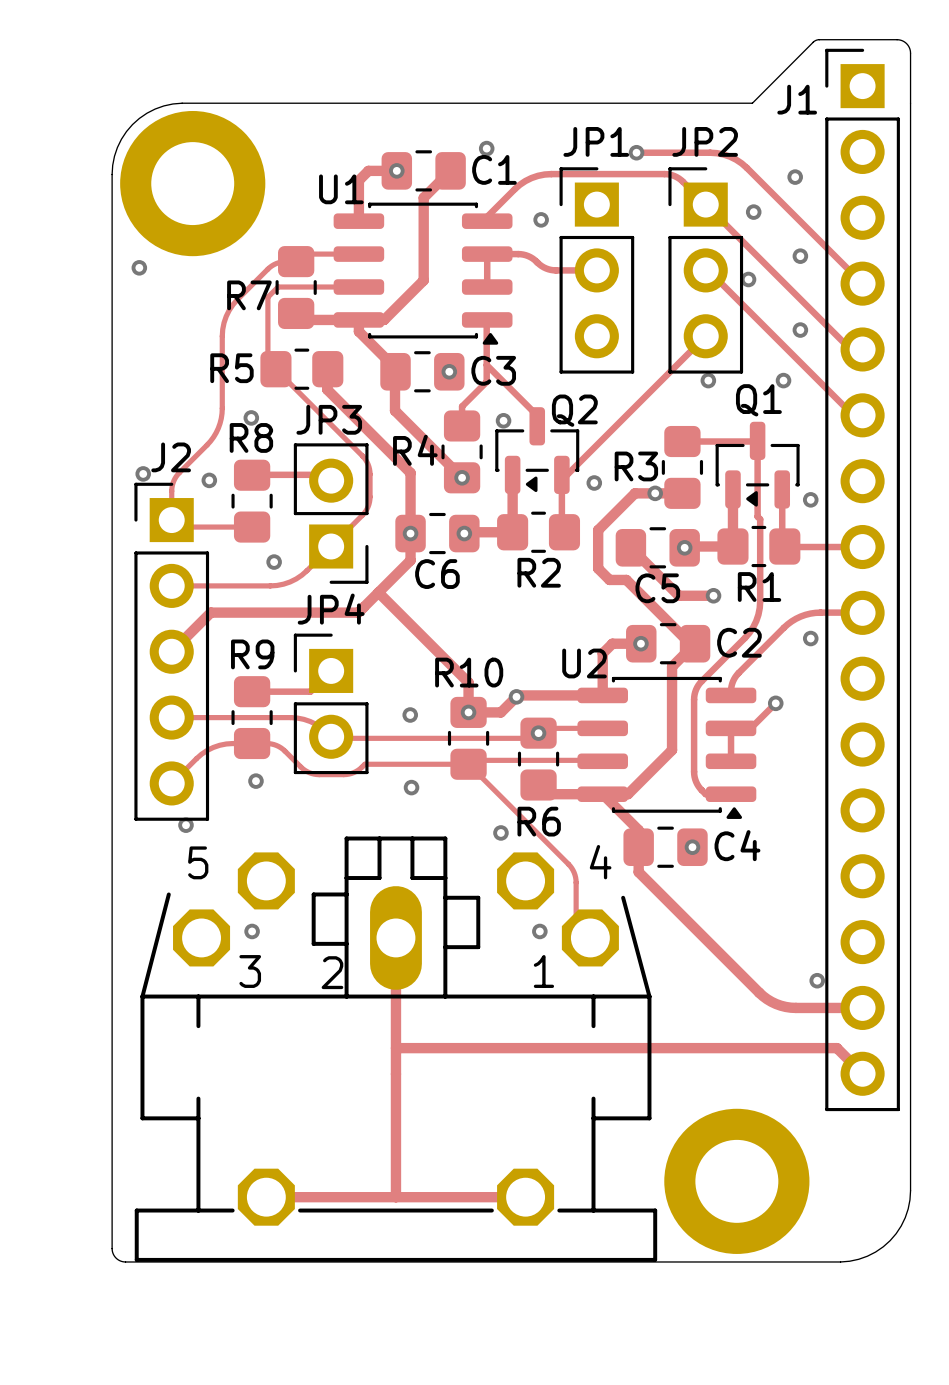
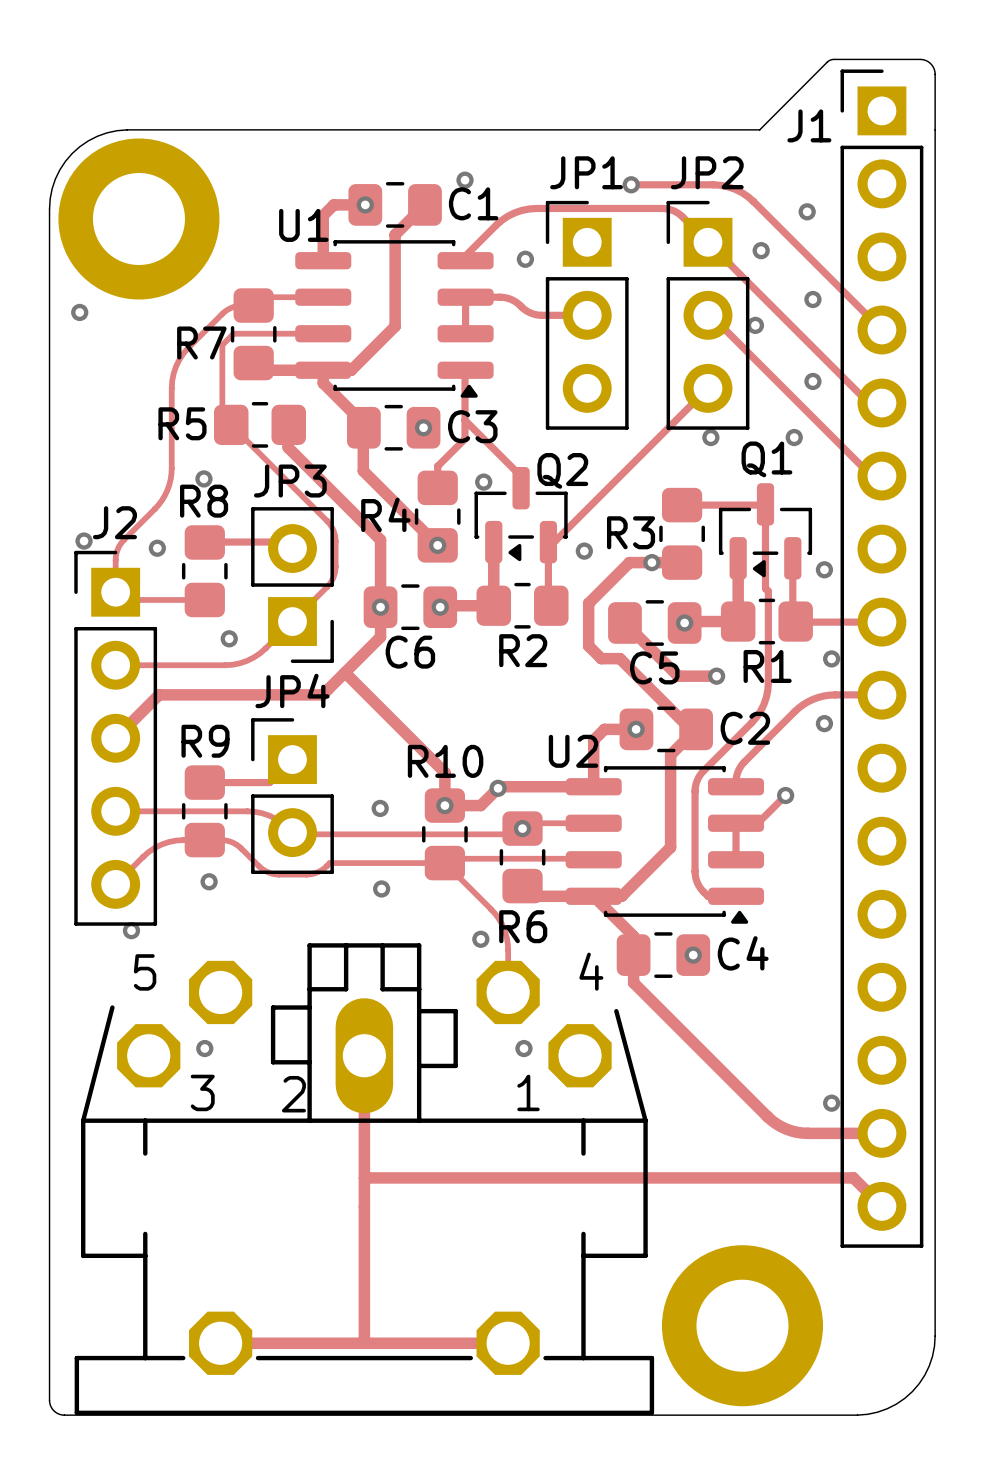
via: none -> (831, 658)
track: (510, 806) (571, 868) (576, 880) (576, 923) (590, 937) -> (491, 909) (501, 923) (507, 938) (508, 992)

